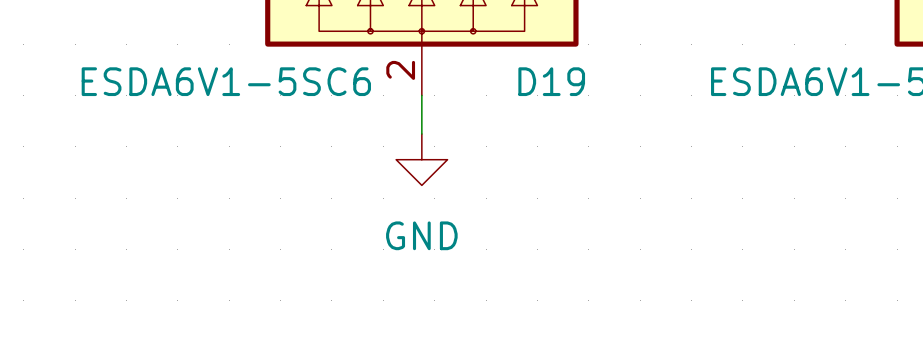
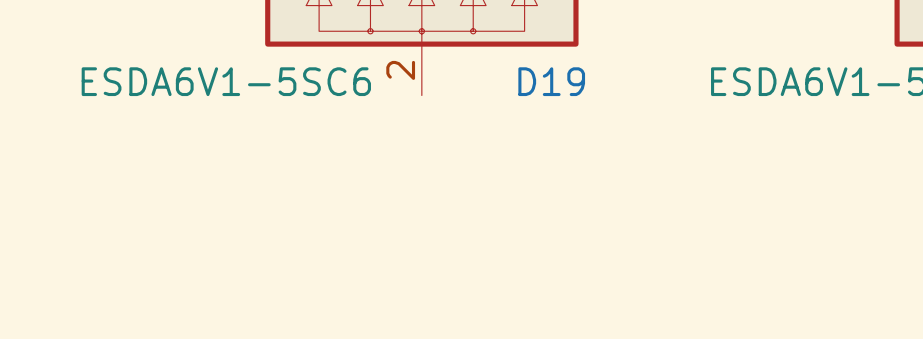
wire: (421, 95) (421, 134) -> none
power symbol: GND (421, 159) -> none

